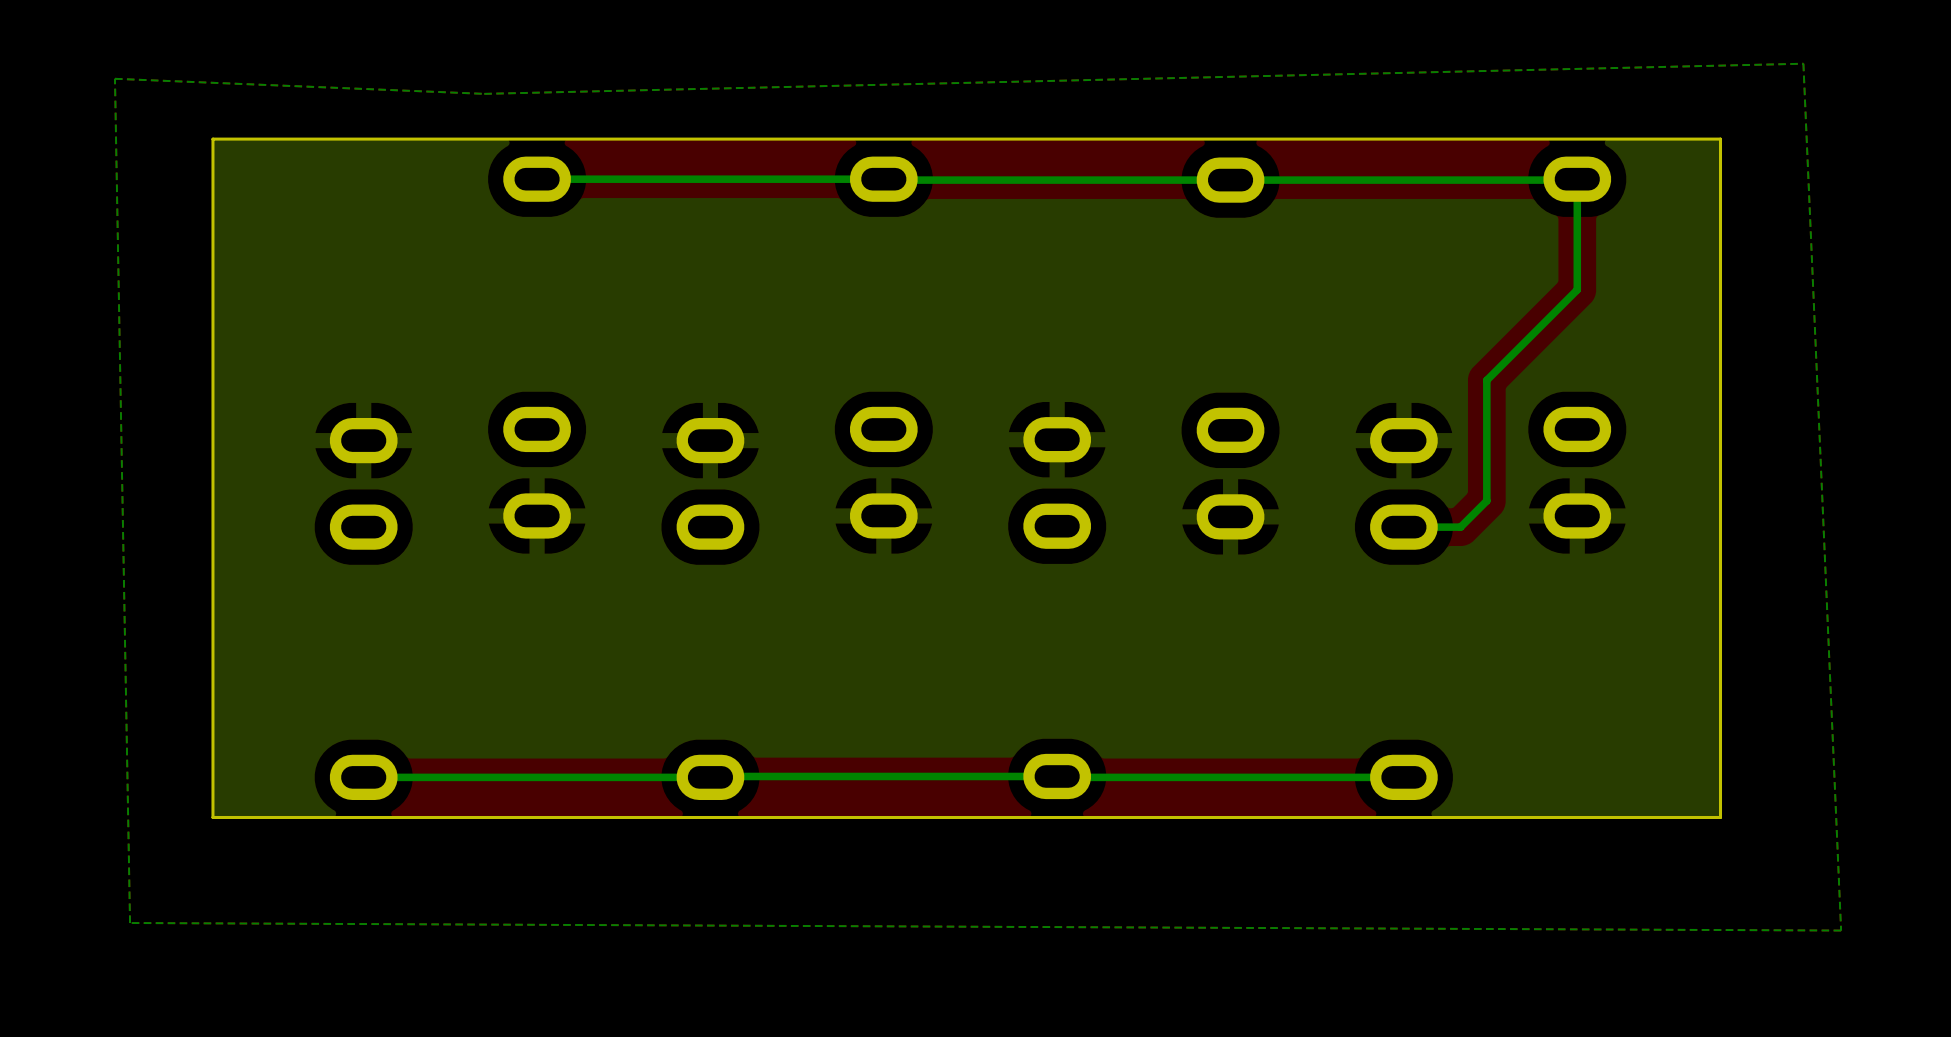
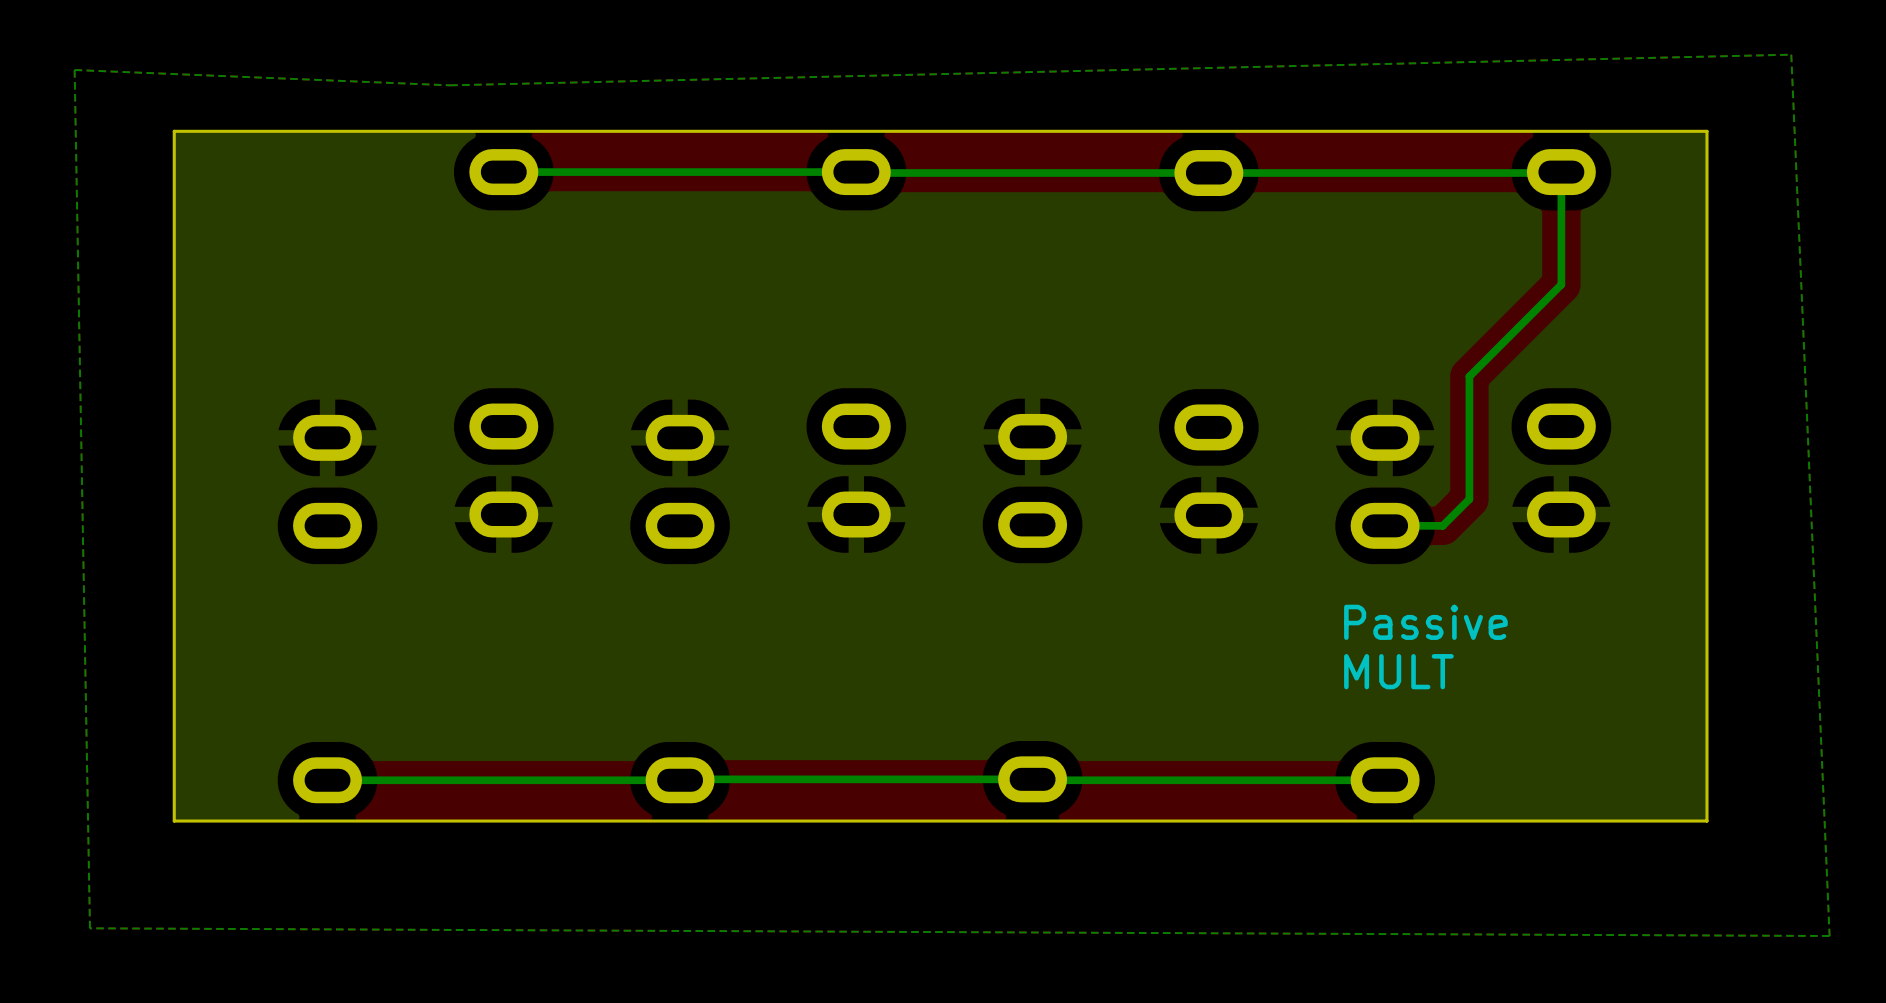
text: none -> Passive (1425, 622)
text: none -> MULT (1398, 671)

